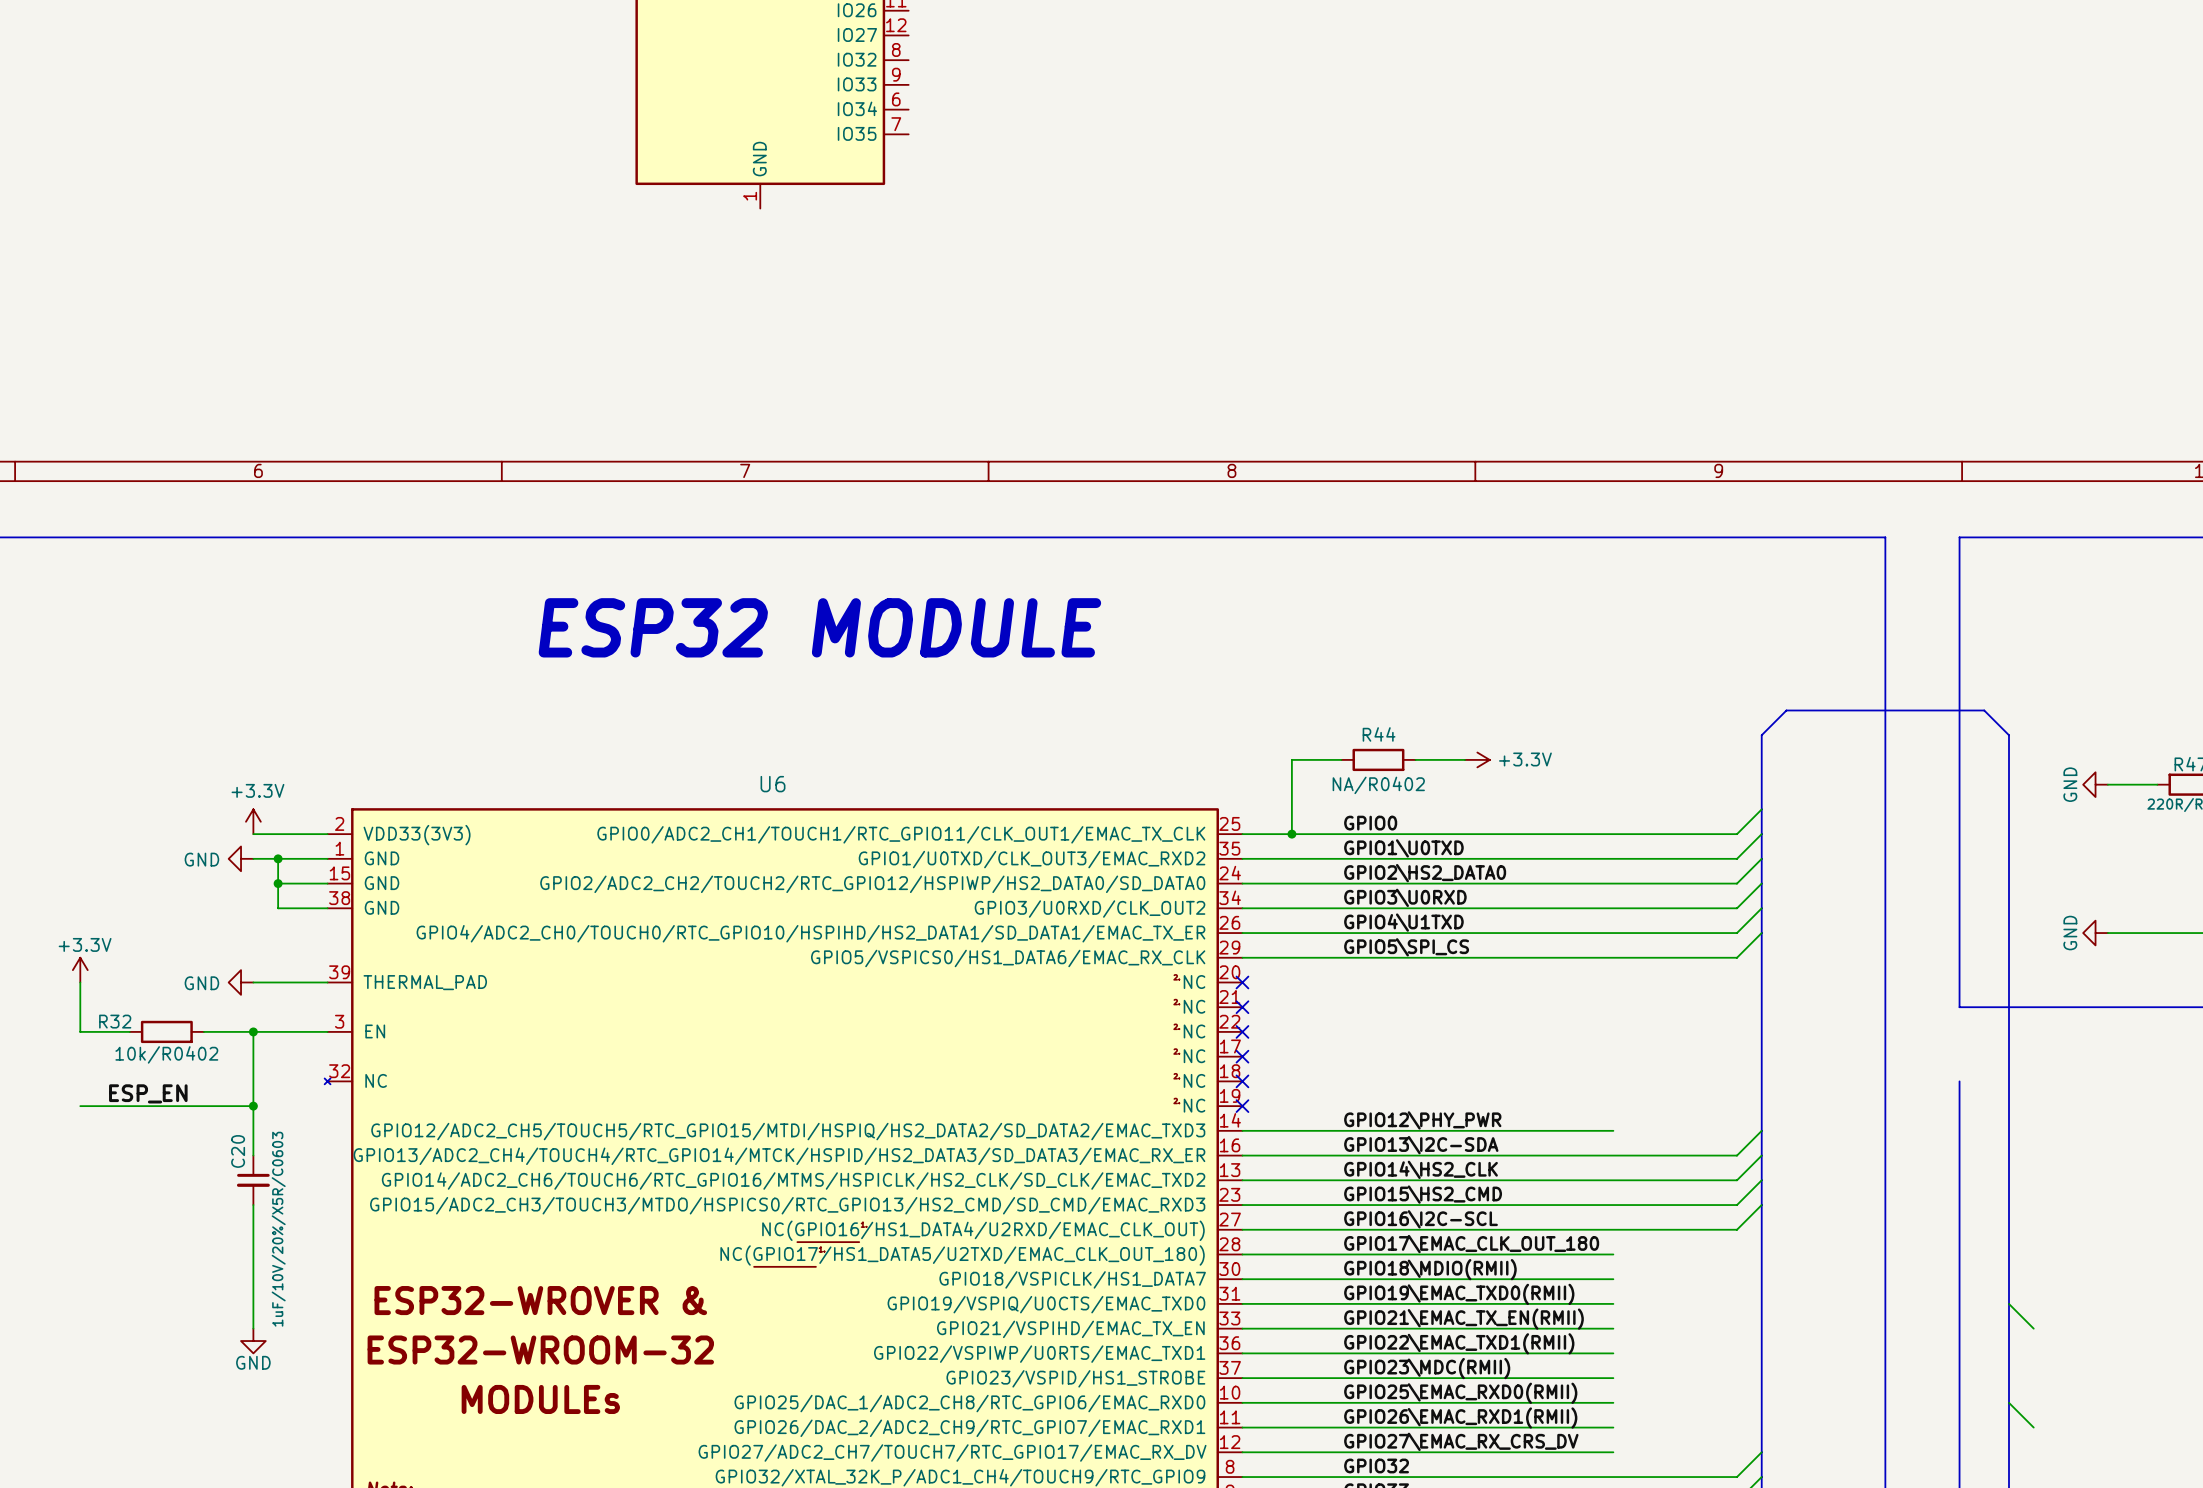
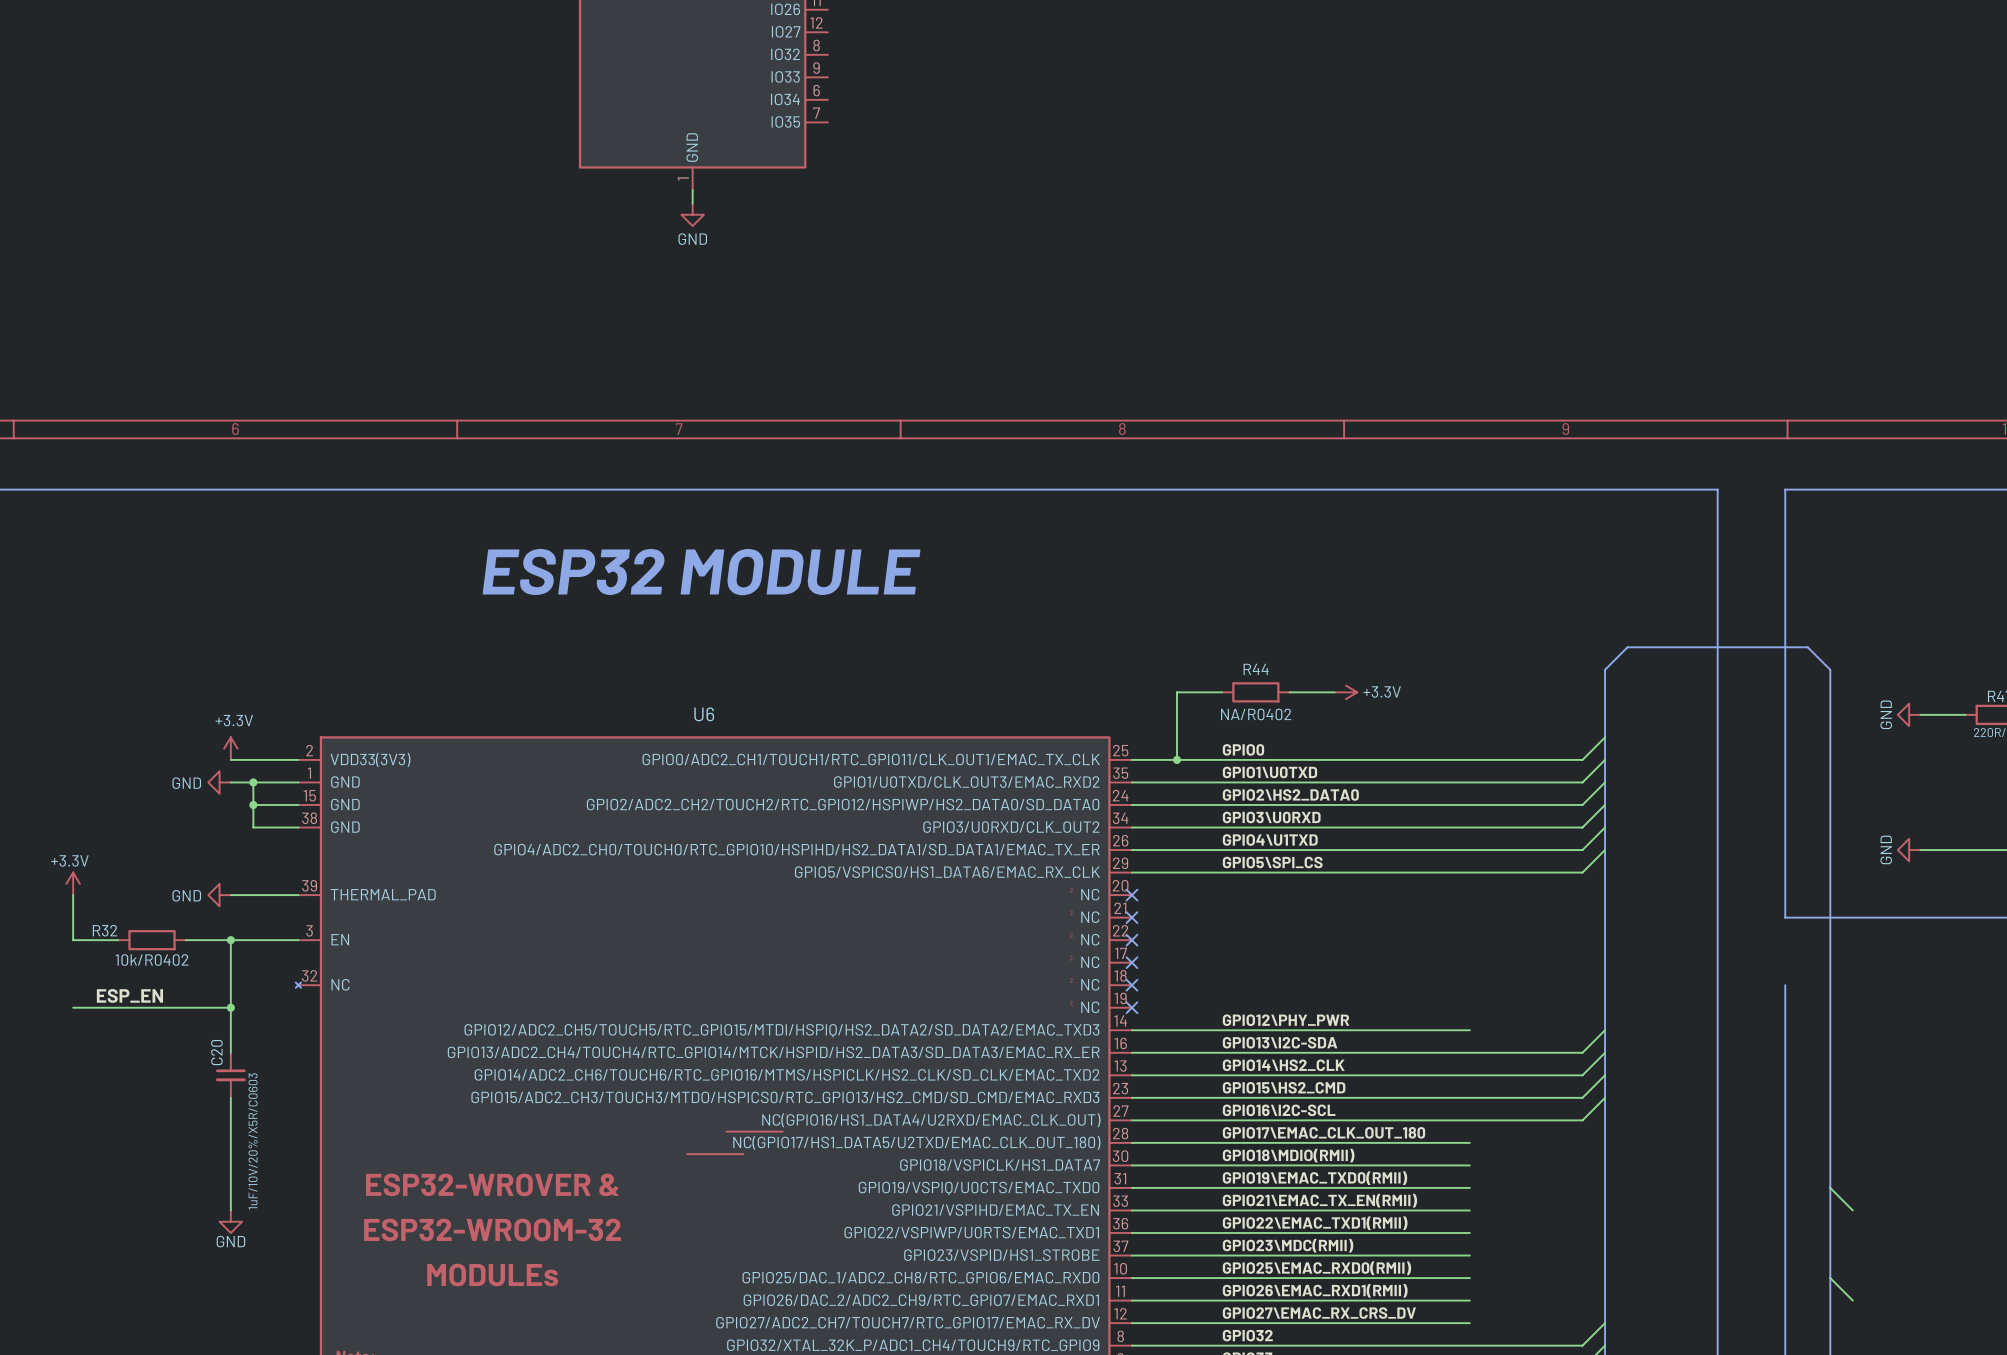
wire: none -> (692, 189) (692, 203)
power symbol: none -> GND (692, 214)

